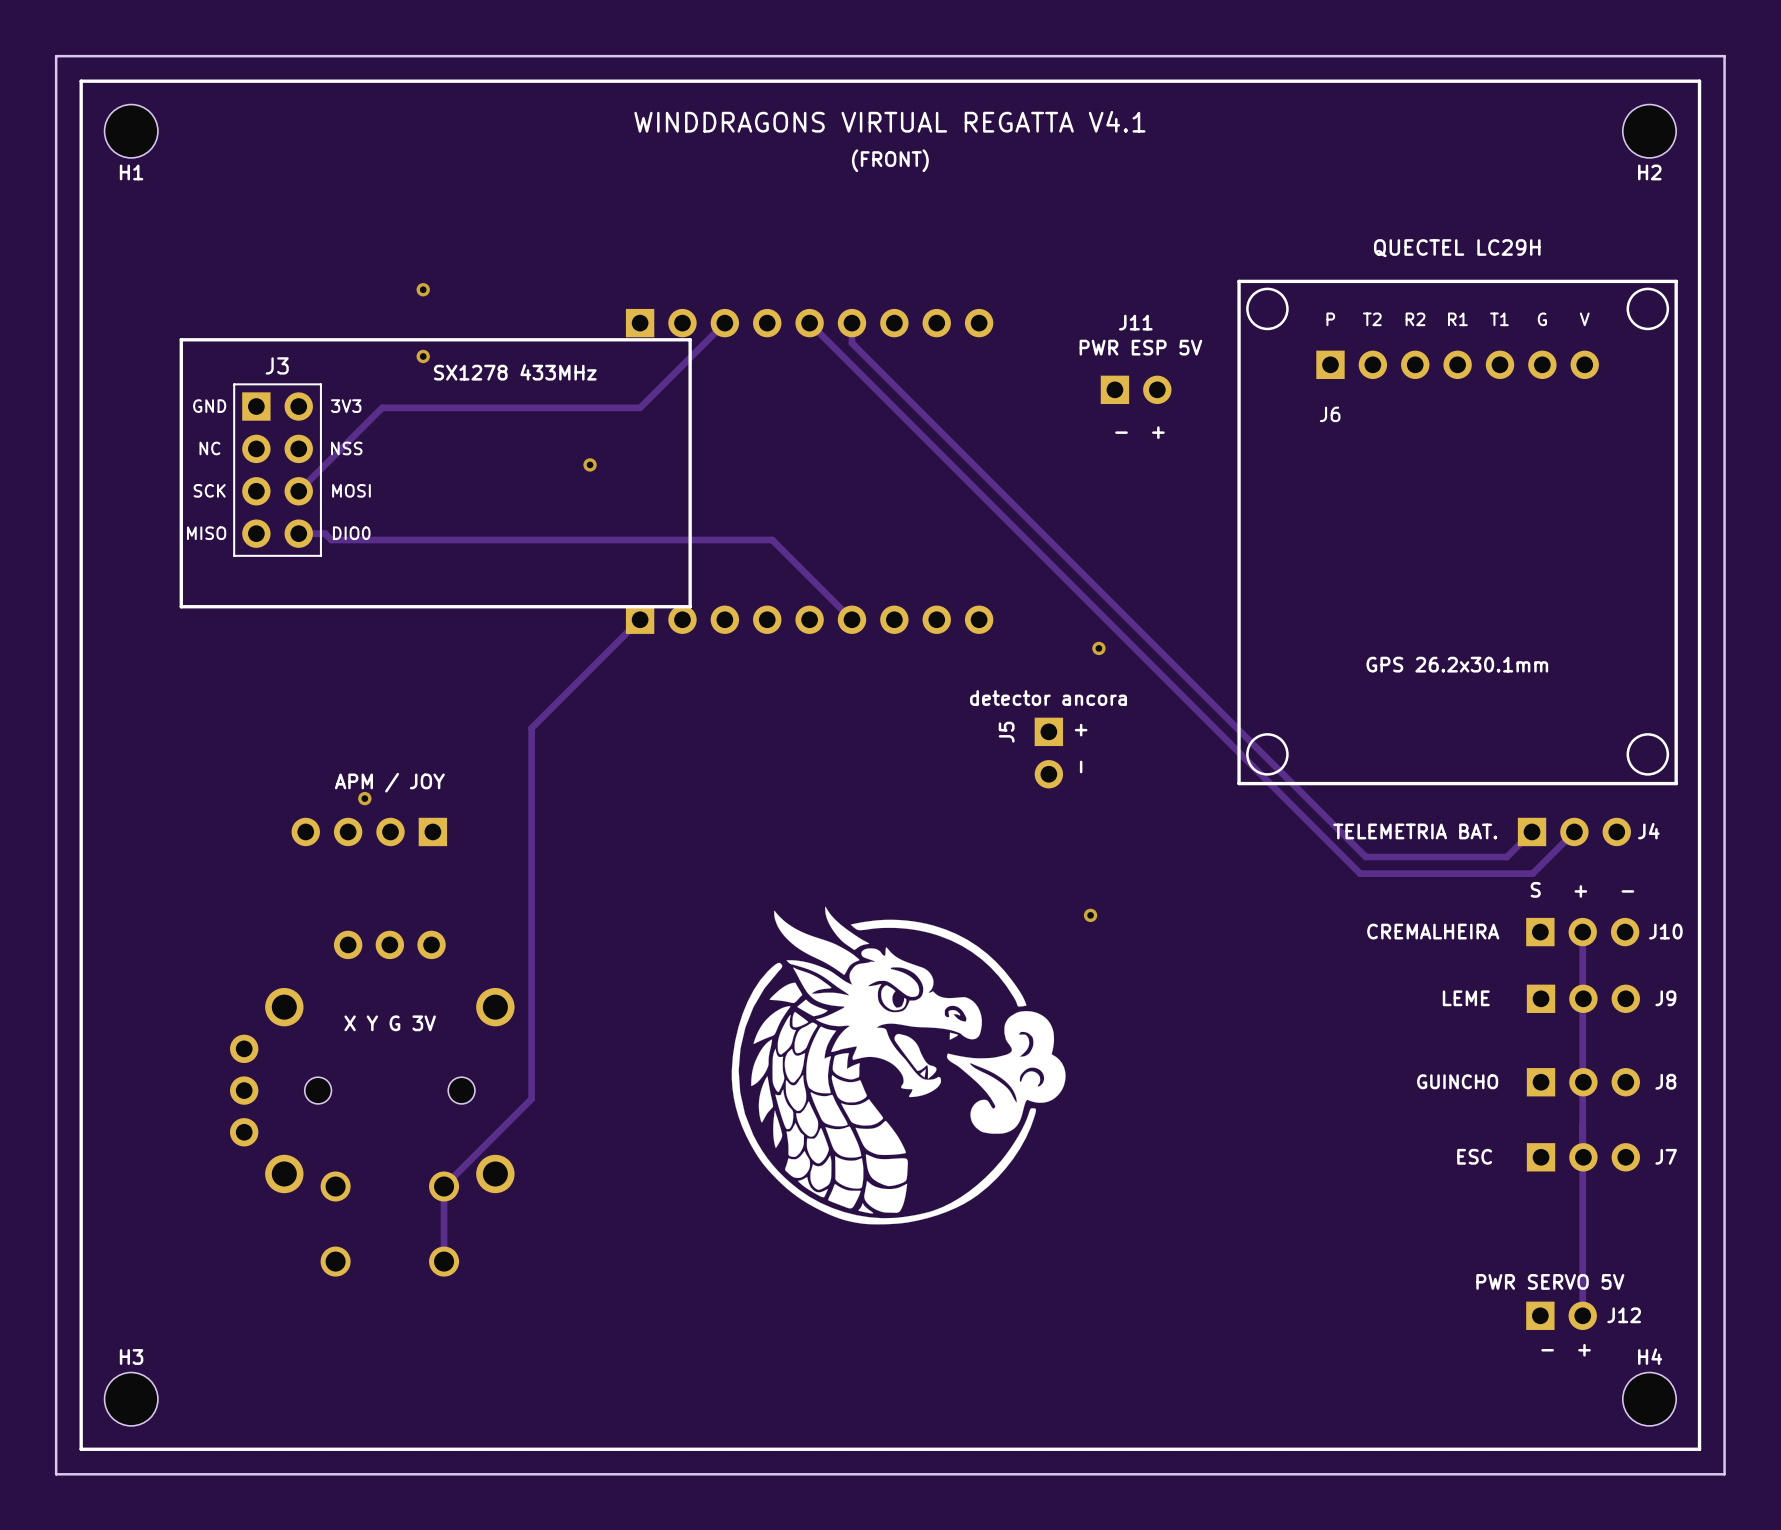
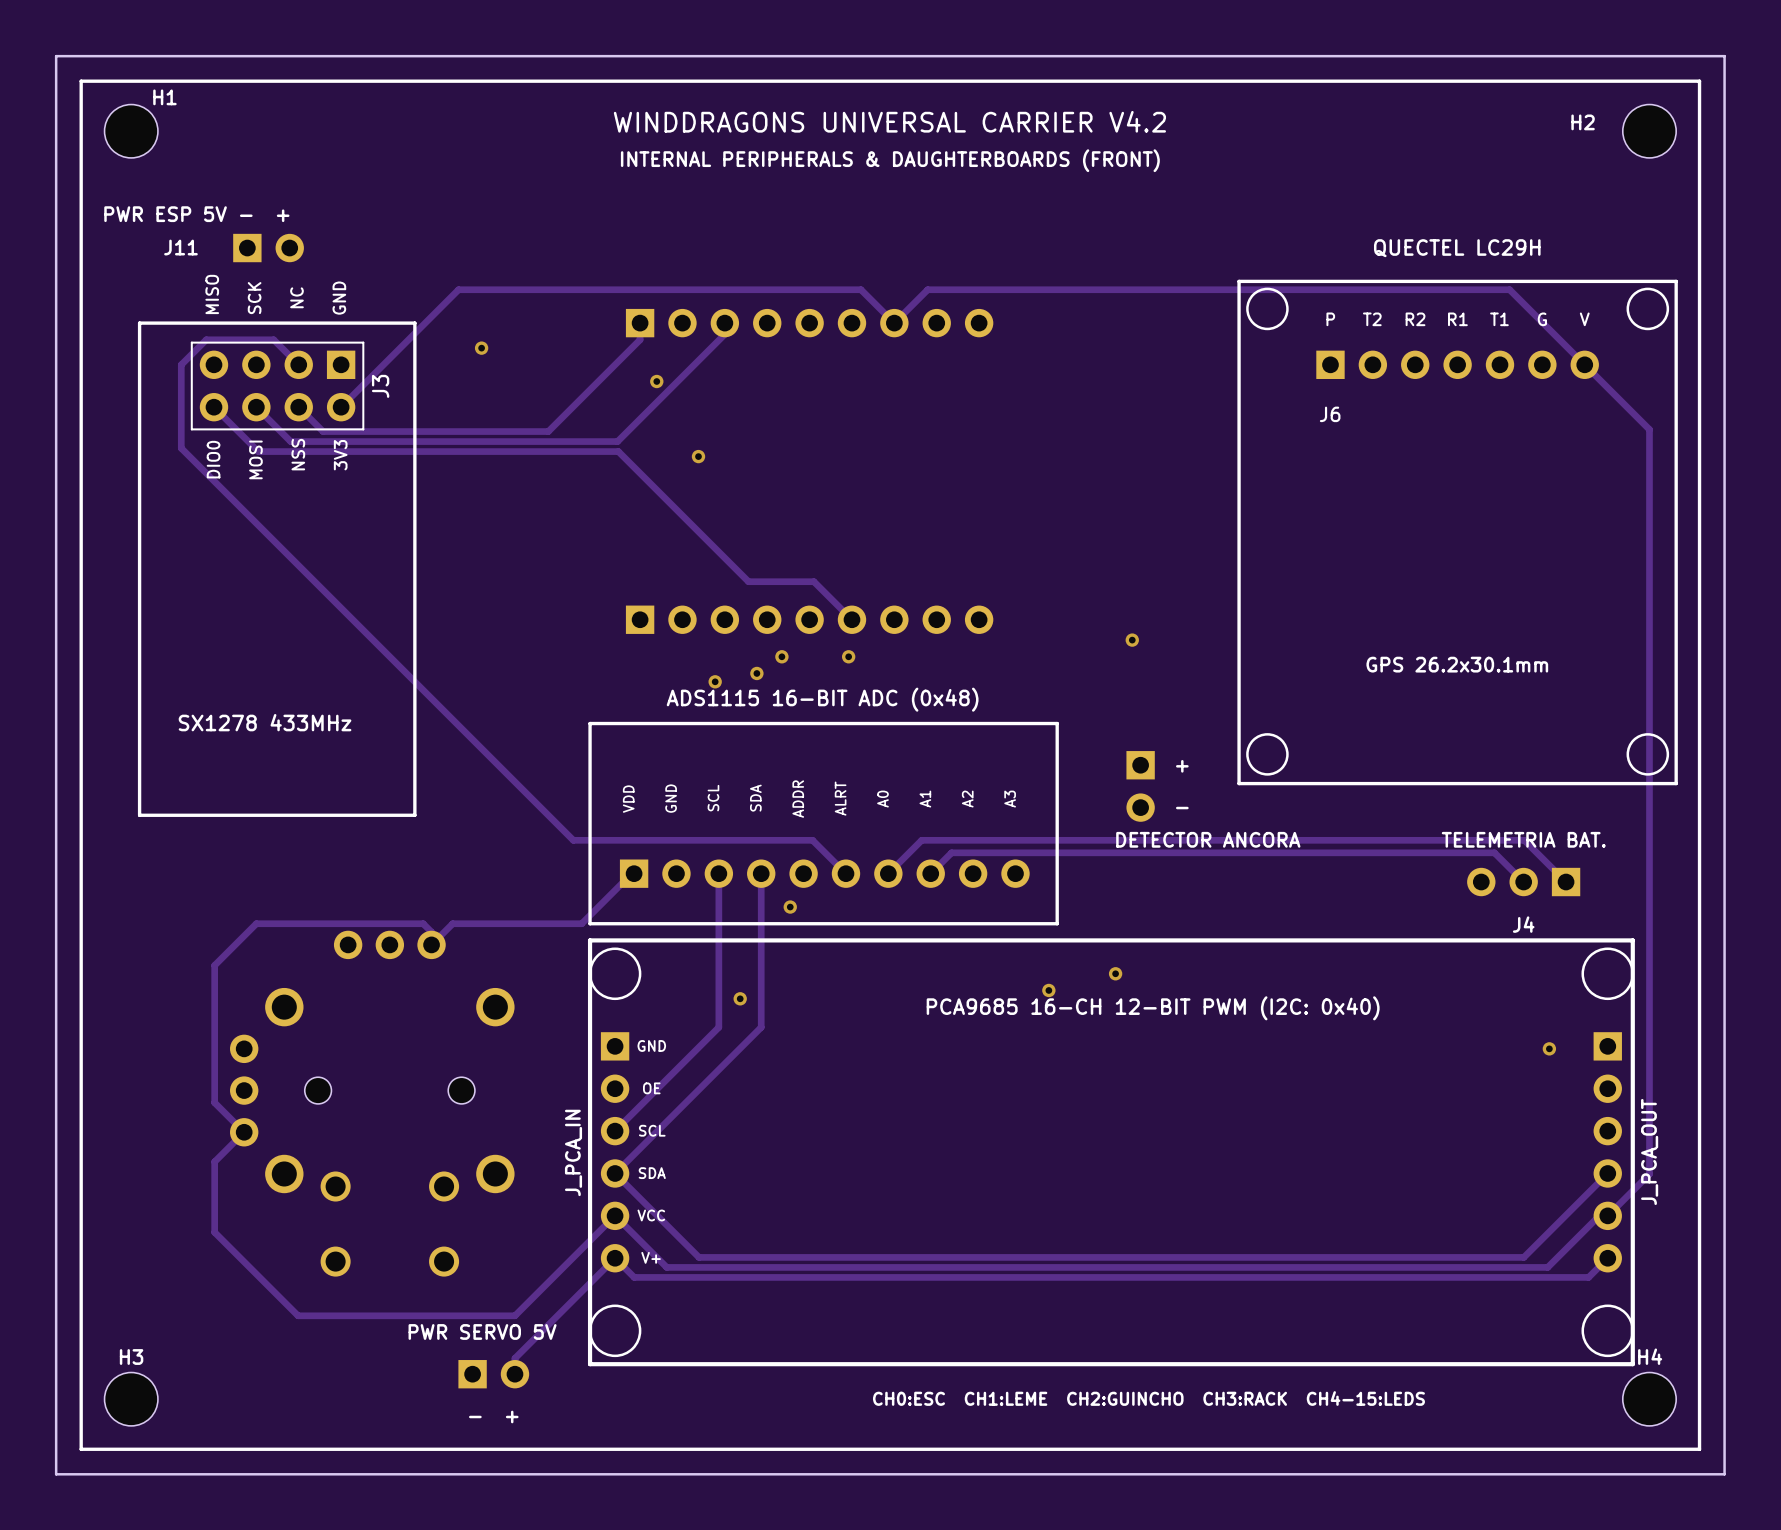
text: WINDDRAGONS VIRTUAL REGATTA V4.1 (889, 121) -> WINDDRAGONS UNIVERSAL CARRIER V4.2 (889, 121)
text: (FRONT) (890, 160) -> INTERNAL PERIPHERALS & DAUGHTERBOARDS (FRONT) (890, 160)
H1 name position: H1 (131, 172) -> H1 (164, 97)
H2 name position: H2 (1649, 172) -> H2 (1583, 122)
text: none -> PWR ESP 5V (165, 214)
text: none -> - + (264, 215)
via: (423, 289) -> none
J11 name position: J11 (1135, 322) -> J11 (180, 247)
line: none -> (139, 323) (414, 323) (414, 815) (139, 815) (139, 323)
track: none -> (640, 323) (640, 339) (548, 431) (323, 431) (298, 407)
track: (724, 323) (640, 407) (382, 407) (298, 491) -> (724, 323) (724, 334) (617, 441) (290, 441) (256, 407)
track: (809, 323) (1360, 873) (1532, 873) (1574, 831) -> none
track: (851, 323) (851, 343) (1365, 856) (1507, 856) (1532, 831) -> none
line: (181, 339) (690, 339) (690, 606) (181, 606) (181, 339) -> none
text: PWR ESP 5V (1140, 347) -> none
via: none -> (481, 348)
via: (423, 356) -> none
track: none -> (298, 364) (273, 339) (206, 339) (181, 364) (181, 448) (573, 840) (812, 840) (845, 873)
J3 name position: J3 (277, 365) -> J3 (380, 386)
text: SX1278 433MHz (515, 372) -> none
via: none -> (656, 381)
J3 footprint: [233, 383, 322, 557] -> [190, 341, 365, 431]
J11 position: (1136, 389) -> (268, 248)
track: none -> (341, 407) (458, 289) (861, 289) (894, 323) (927, 289) (1509, 289) (1649, 429) (1649, 1174) (1607, 1215) (1599, 1215) (1547, 1267) (666, 1267) (615, 1215)
text: - + (1139, 432) -> none
via: none -> (698, 456)
via: (590, 464) -> none
track: (298, 533) (325, 533) (331, 540) (772, 540) (813, 581) -> (213, 407) (258, 451) (618, 451) (748, 581) (813, 581)
track: (640, 619) (531, 728) (531, 1098) (444, 1186) (444, 1261) -> none
via position: (1098, 648) -> (1132, 640)
via: none -> (781, 656)
via: none -> (848, 656)
via: none -> (756, 673)
via: none -> (715, 681)
text: detector ancora (1048, 697) -> none
text: none -> ADS1115 16-BIT ADC (0x48) (822, 699)
text: none -> SX1278 433MHz (265, 722)
line: none -> (590, 723) (1057, 723) (1057, 923) (590, 923) (590, 723)
text: + - (1081, 748) -> none
J5: (1048, 753) -> none
text: none -> + (1182, 766)
text: APM / JOY (389, 782) -> none
part: none -> (1140, 786)
via: (364, 798) -> none
text: none -> - (1182, 808)
part: (369, 831) -> none
text position: TELEMETRIA BAT. (1415, 831) -> TELEMETRIA BAT. (1523, 839)
J4 rotation: 0° (1574, 831) -> 180° (1523, 882)
J4 position: (1574, 831) -> (1523, 882)
J4 name position: J4 (1648, 831) -> J4 (1523, 924)
text: none -> DETECTOR ANCORA (1208, 839)
track: none -> (634, 873) (631, 873) (581, 923) (452, 923) (431, 944) (431, 932) (423, 923) (256, 923) (214, 965) (214, 1102) (244, 1132) (214, 1161) (214, 1232) (298, 1315) (514, 1315) (614, 1215)
track: none -> (718, 873) (718, 1027) (615, 1131)
track: none -> (761, 873) (761, 1027) (615, 1173) (698, 1257) (1523, 1257) (1607, 1173)
part: none -> (824, 873)
track: none -> (888, 873) (921, 840) (1524, 840) (1566, 882)
track: none -> (930, 873) (951, 852) (1494, 852) (1523, 882)
text: S + - (1582, 889) -> none
drawing: [731, 906, 1066, 1225] -> none
via: none -> (790, 907)
via: (1090, 915) -> none
text: CREMALHEIRA (1433, 931) -> none
track: (1582, 932) (1582, 1315) -> none
J10: (1582, 932) -> none
line: none -> (590, 940) (1632, 940) (1632, 1364) (590, 1364) (590, 940)
drawing: none -> [588, 947, 642, 1001]
drawing: none -> [1581, 947, 1635, 1001]
via: none -> (1115, 973)
via: none -> (1048, 990)
via: none -> (740, 998)
text: LEME (1466, 998) -> none
J9: (1583, 998) -> none
text: none -> PCA9685 16-CH 12-BIT PWM (I2C: 0x40) (1153, 1008)
text: X Y G 3V (390, 1023) -> none
via: none -> (1549, 1048)
text: GUINCHO (1457, 1081) -> none
J8: (1583, 1082) -> none
J_PCA_IN: none -> (615, 1152)
J_PCA_OUT: none -> (1607, 1152)
text: ESC (1474, 1156) -> none
J7: (1583, 1157) -> none
track: none -> (1607, 1258) (1588, 1277) (634, 1277) (615, 1258) (514, 1358) (514, 1374)
text: PWR SERVO 5V (1550, 1281) -> none
drawing: none -> [588, 1304, 642, 1358]
drawing: none -> [1581, 1304, 1635, 1358]
J12: (1561, 1315) -> none
text: none -> PWR SERVO 5V (482, 1331)
text: - + (1566, 1350) -> none
part: none -> (493, 1374)
text: none -> CH0:ESC CH1:LEME CH2:GUINCHO CH3:RACK CH4-15:LEDS (1148, 1398)
text: none -> - + (493, 1416)

